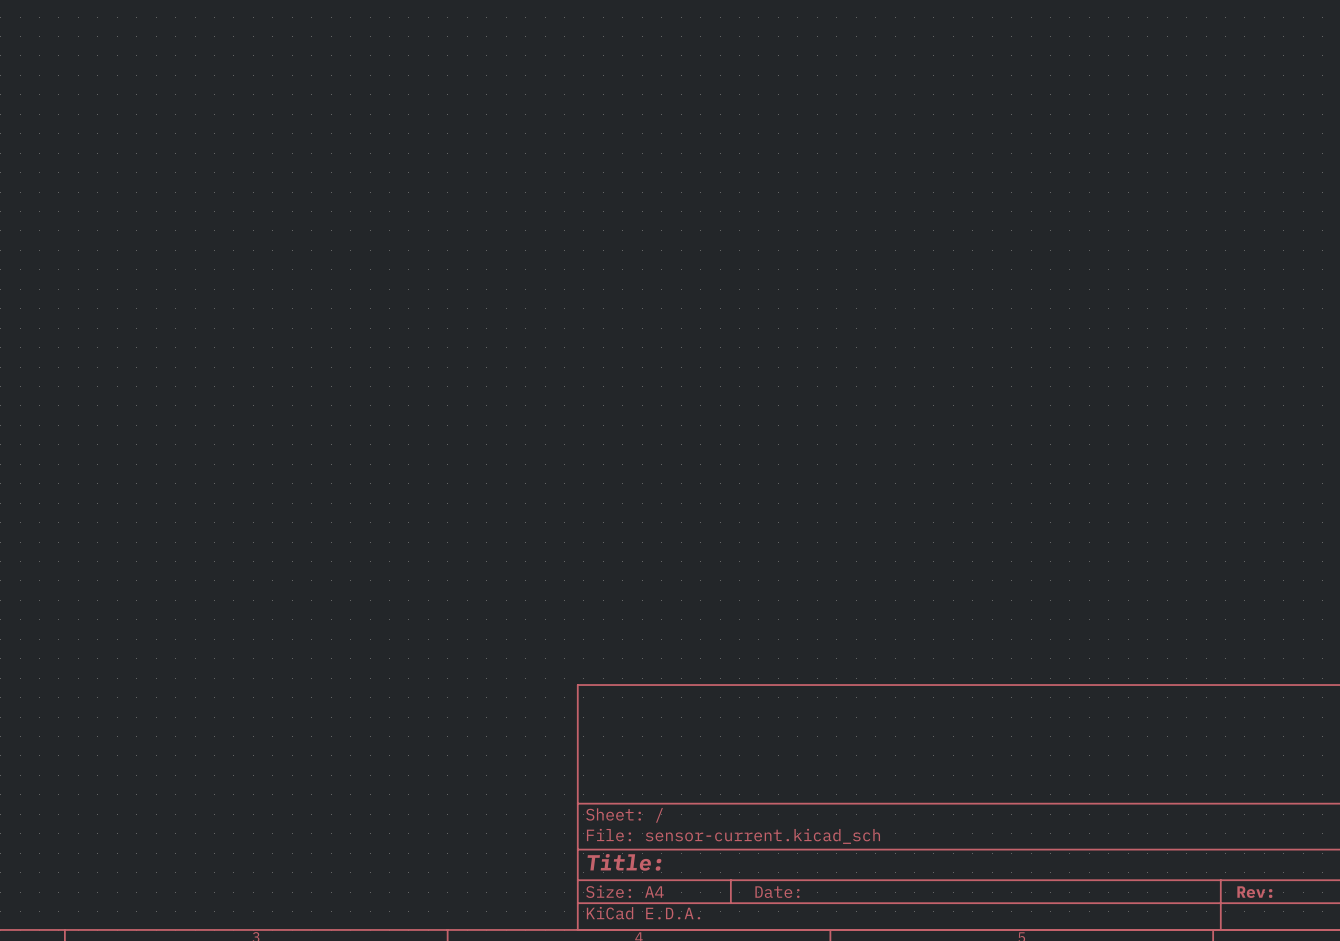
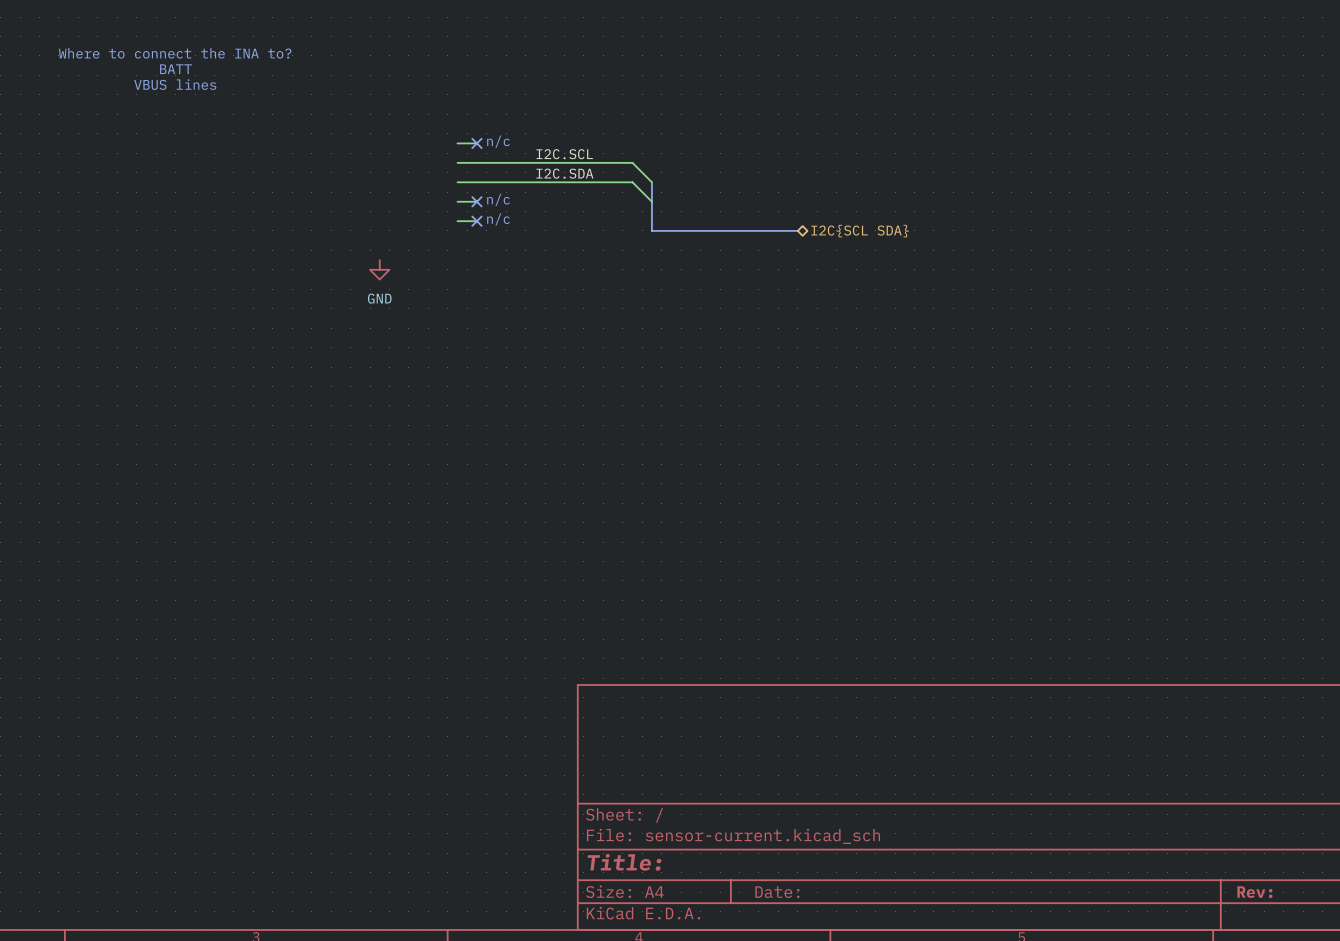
text: none -> Where to connect the INA to? (175, 53)
text: none -> BATT (176, 69)
text: none -> VBUS lines (175, 84)
text: none -> n/c (498, 141)
wire: none -> (457, 143) (476, 143)
no-connect mark: none -> (476, 143)
label: none -> I2C.SCL (564, 154)
wire: none -> (457, 162) (632, 162) (651, 182)
label: none -> I2C.SDA (564, 173)
wire: none -> (457, 182) (632, 182) (651, 201)
bus: none -> (651, 182) (651, 230) (797, 230)
text: none -> n/c (498, 200)
wire: none -> (457, 201) (476, 201)
no-connect mark: none -> (476, 201)
text: none -> n/c (498, 219)
wire: none -> (457, 221) (476, 221)
no-connect mark: none -> (476, 221)
hierarchical label: none -> I2C{SCL SDA} (860, 231)
power symbol: none -> GND (379, 269)

